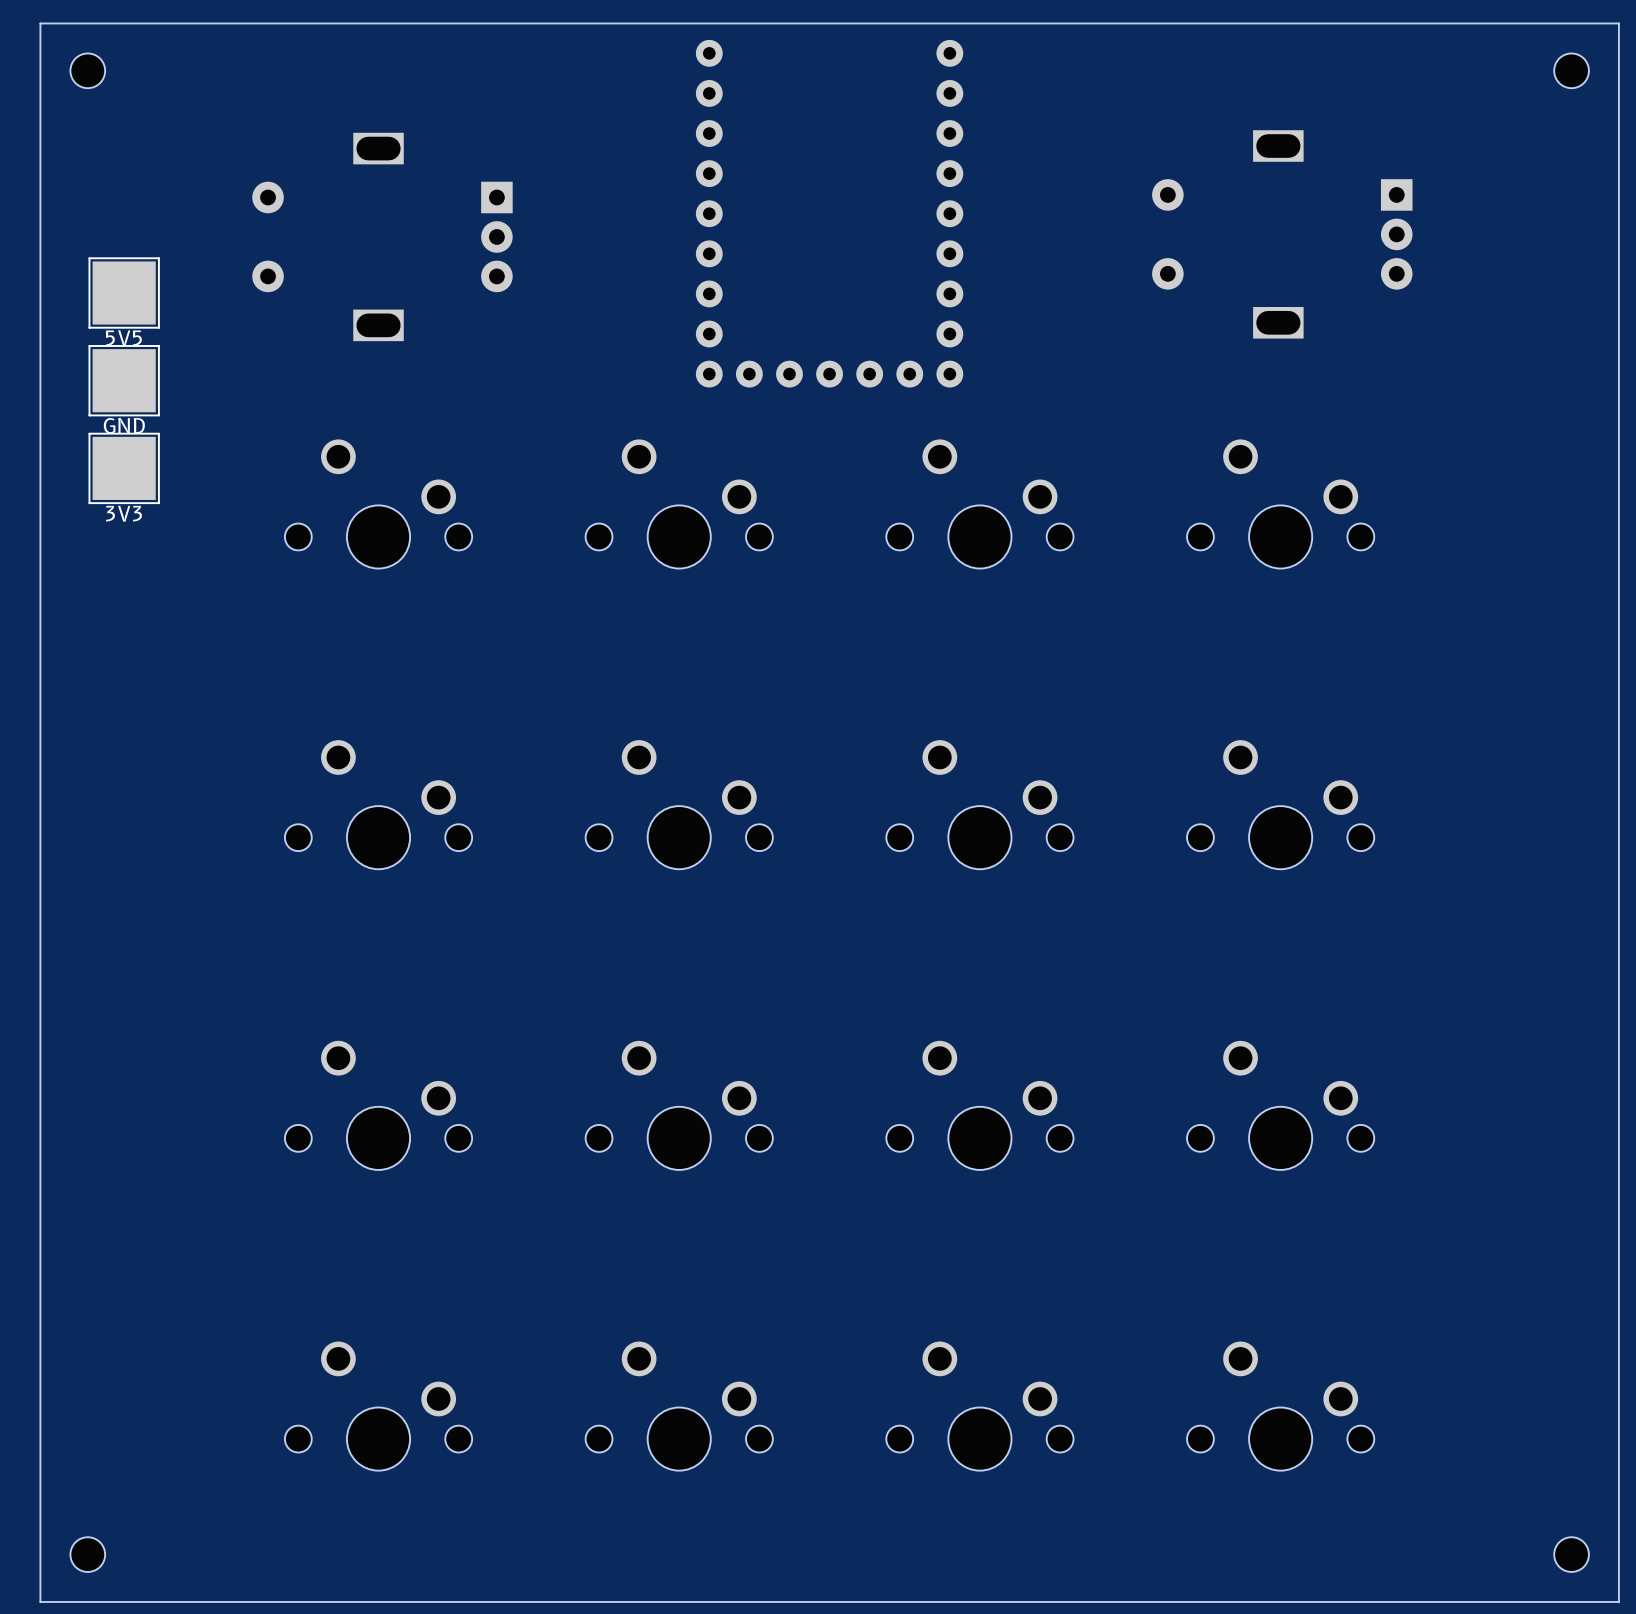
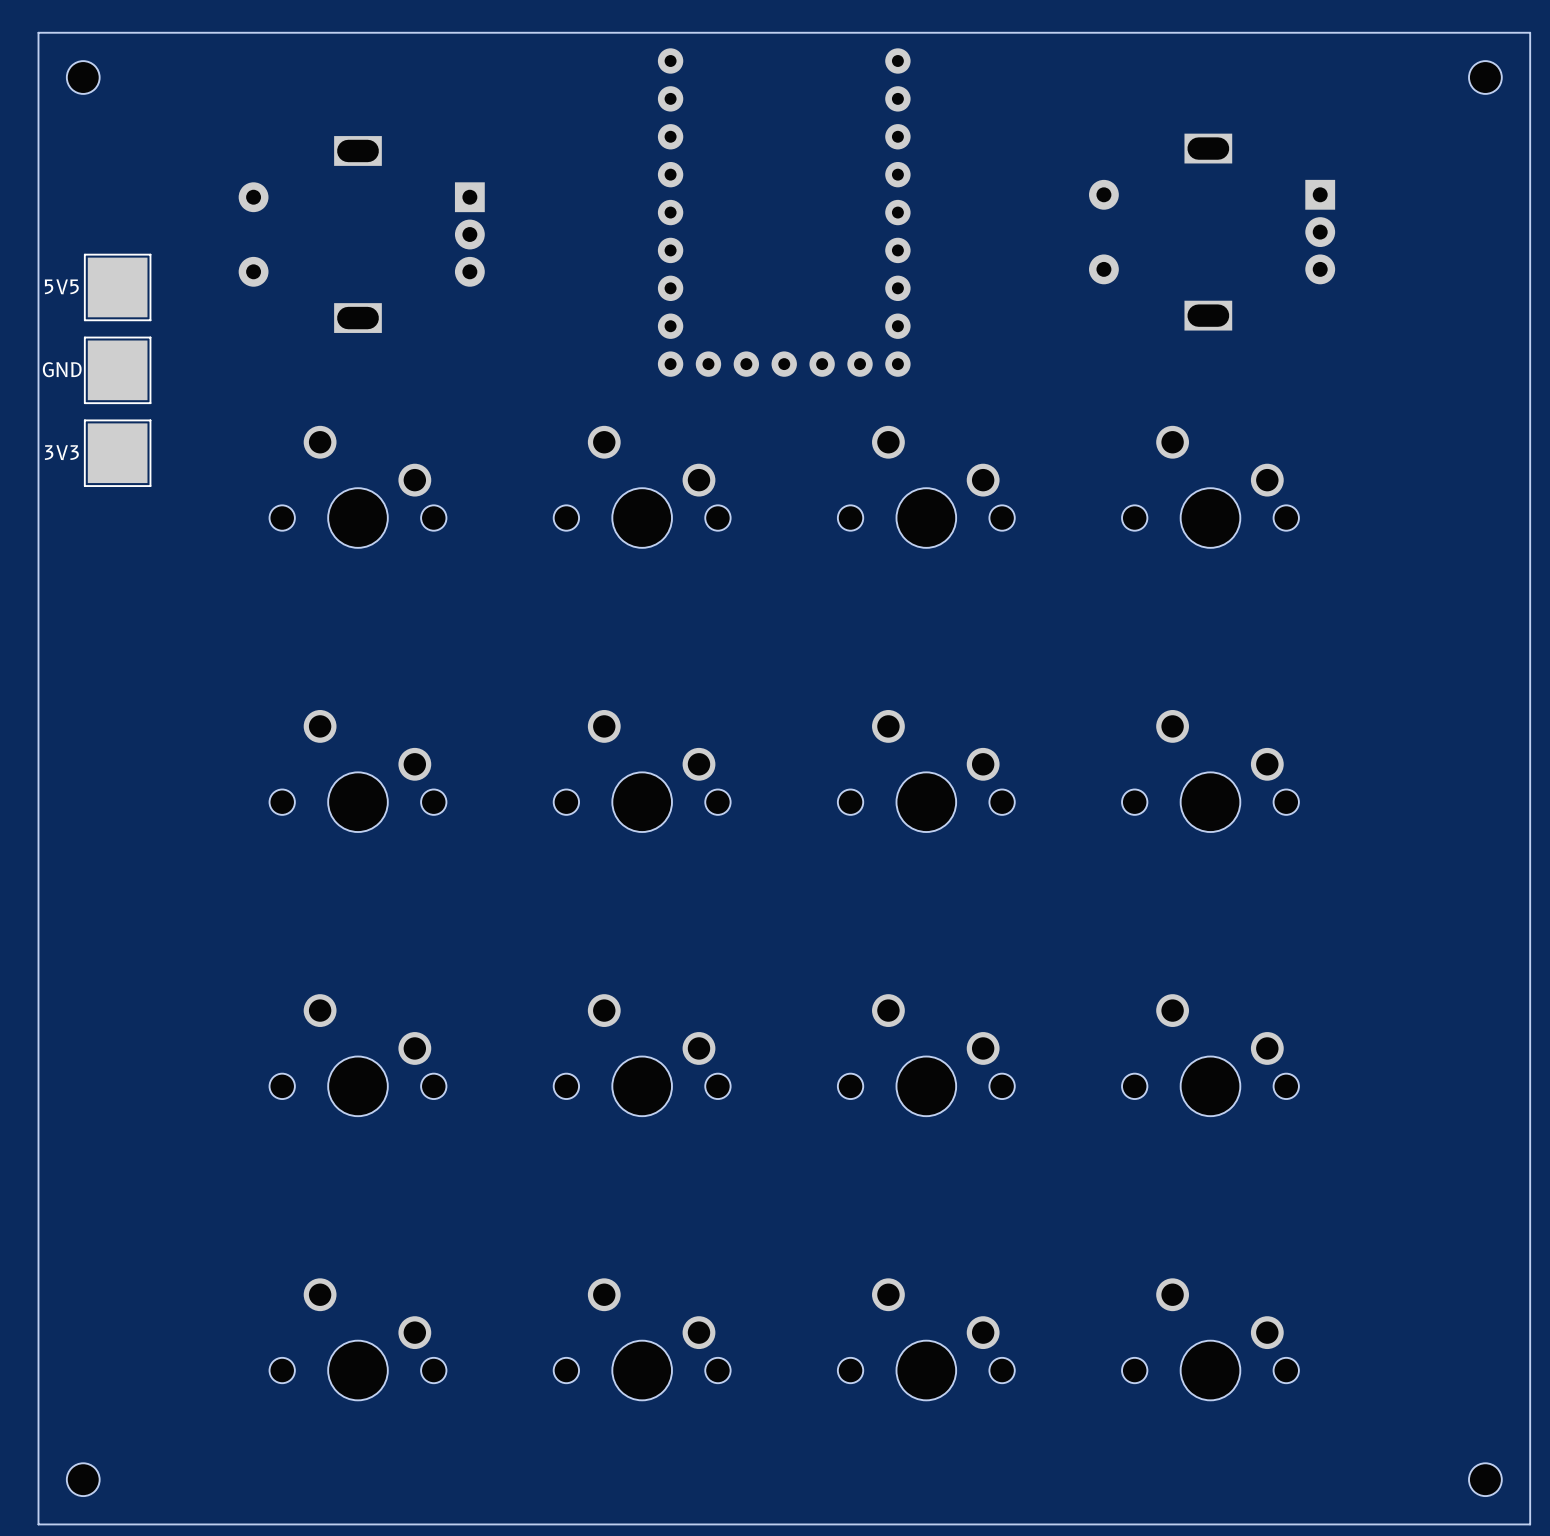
5V5 name position: 5V5 (123, 338) -> 5V5 (61, 286)
GND name position: GND (124, 425) -> GND (62, 369)
3V3 name position: 3V3 (123, 513) -> 3V3 (61, 452)

